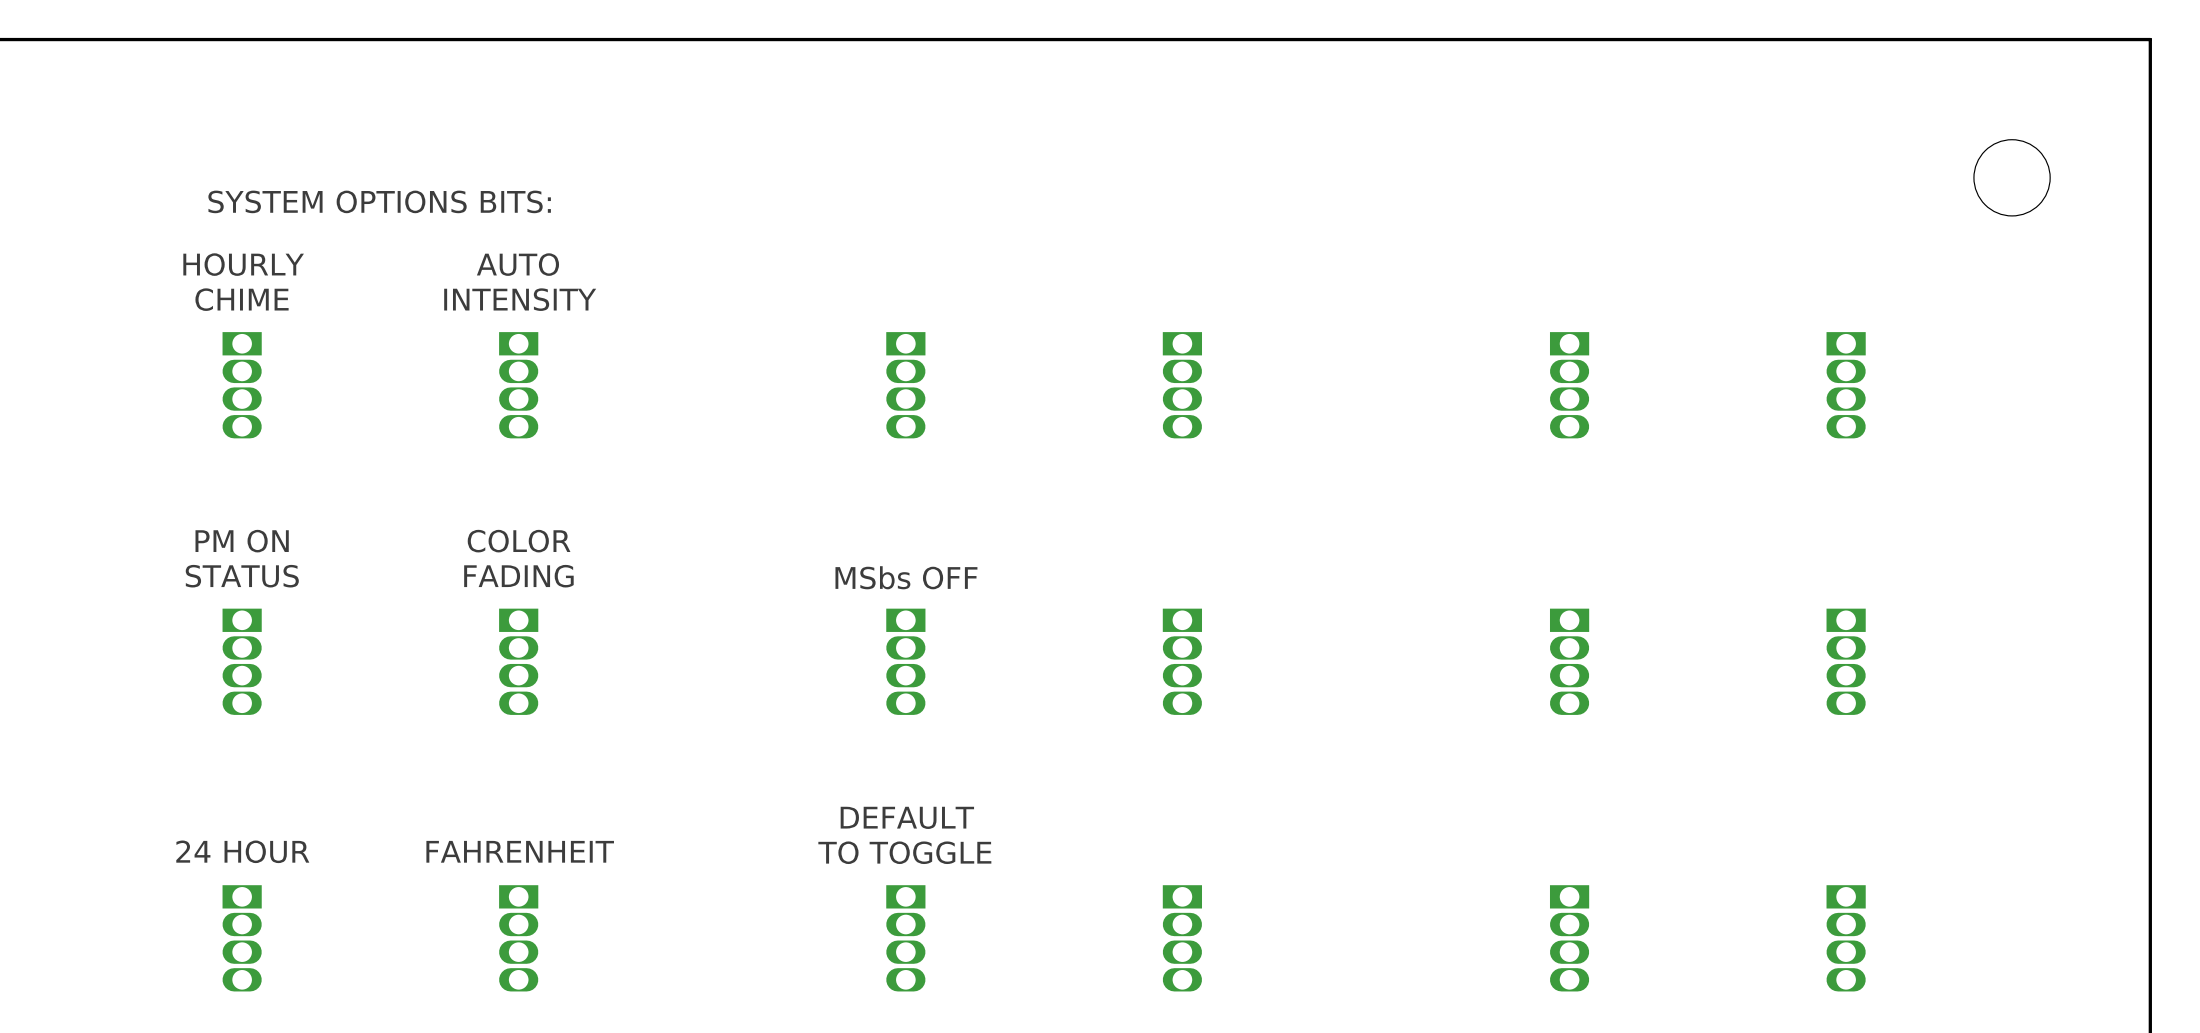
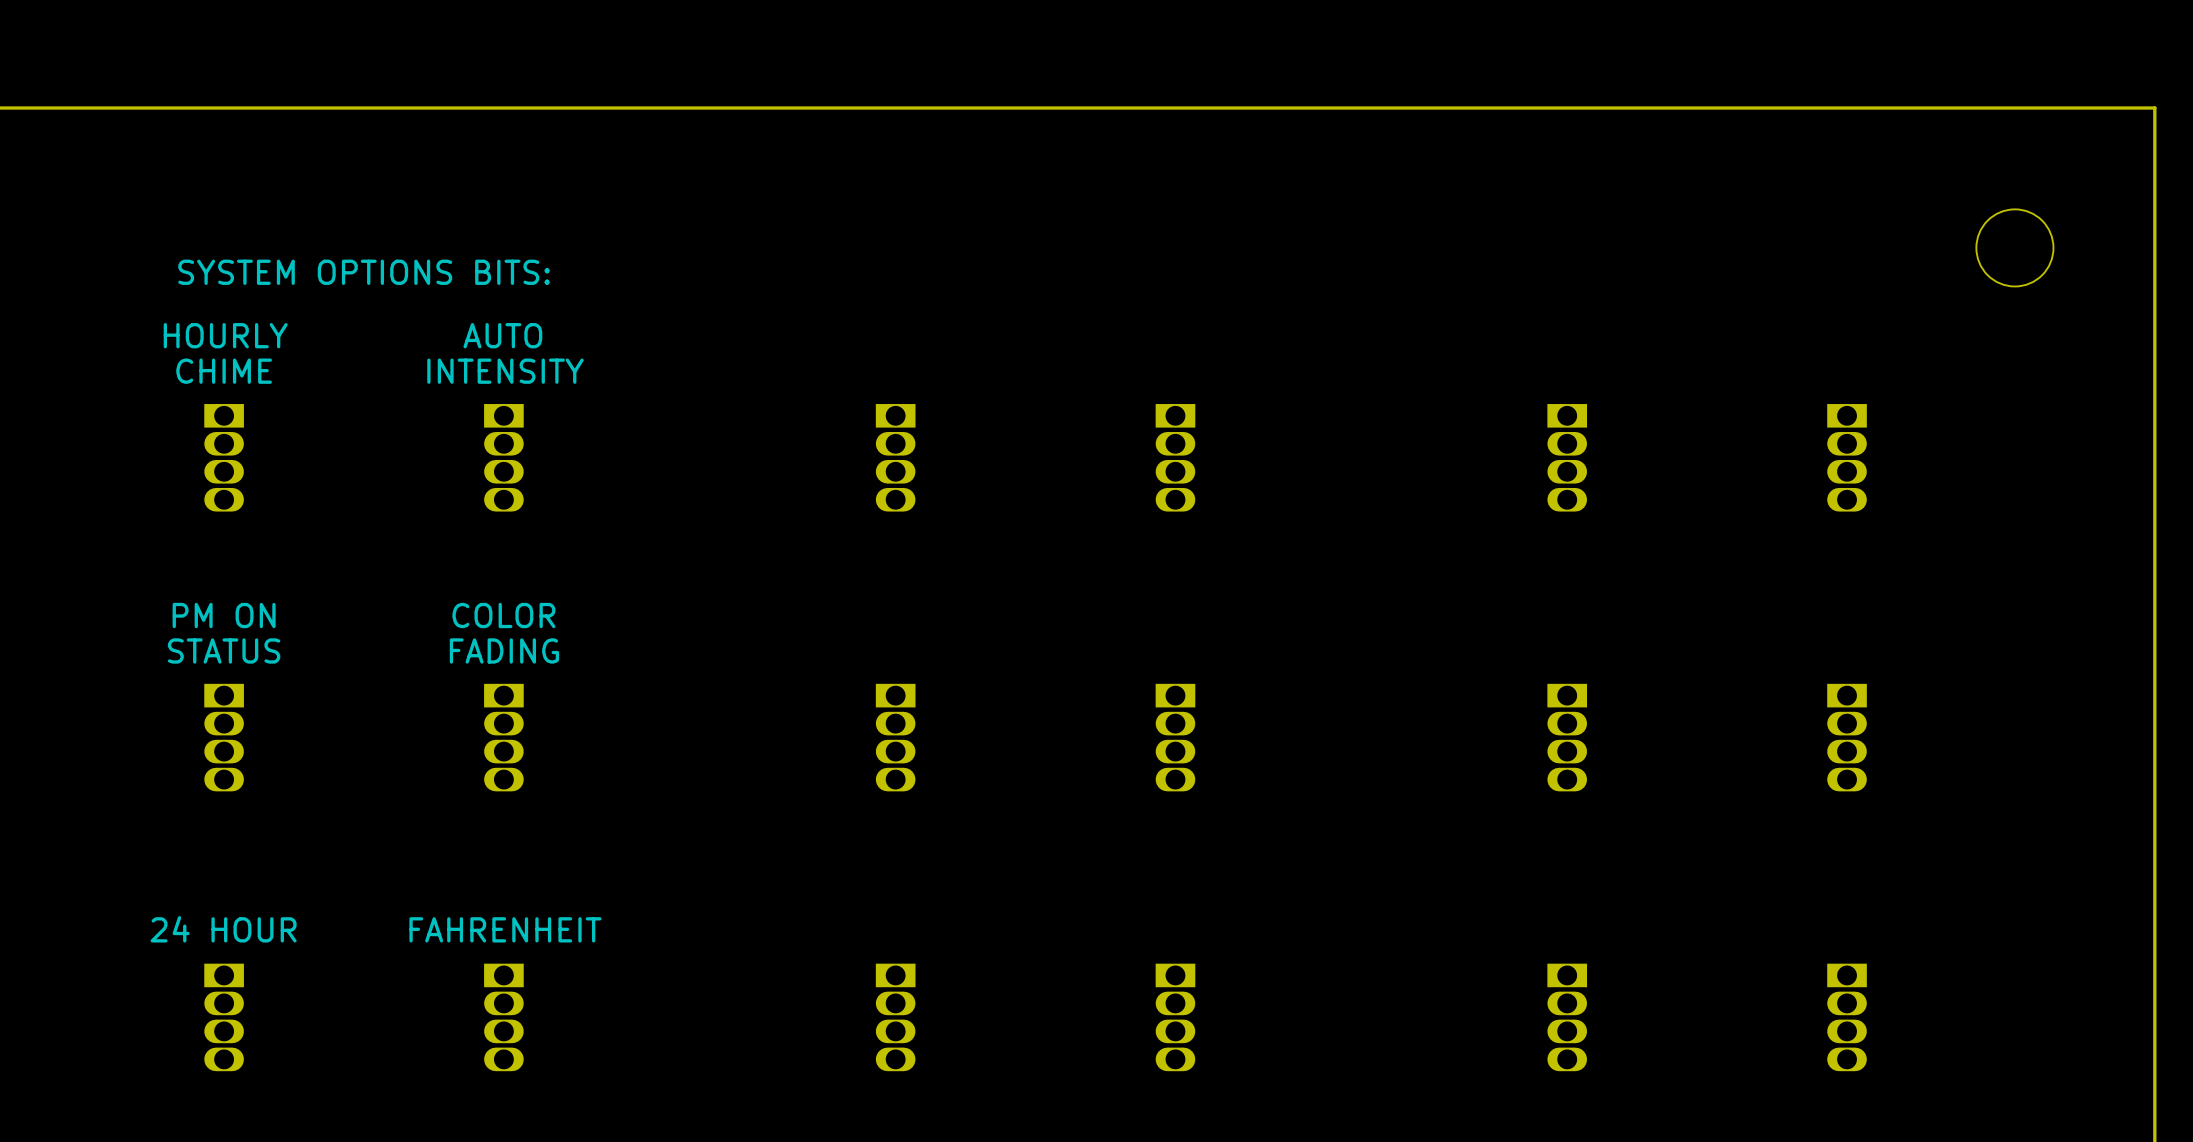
text: MSbs OFF (906, 577) -> none
text: DEFAULT (907, 817) -> none
text: TO TOGGLE (904, 852) -> none

